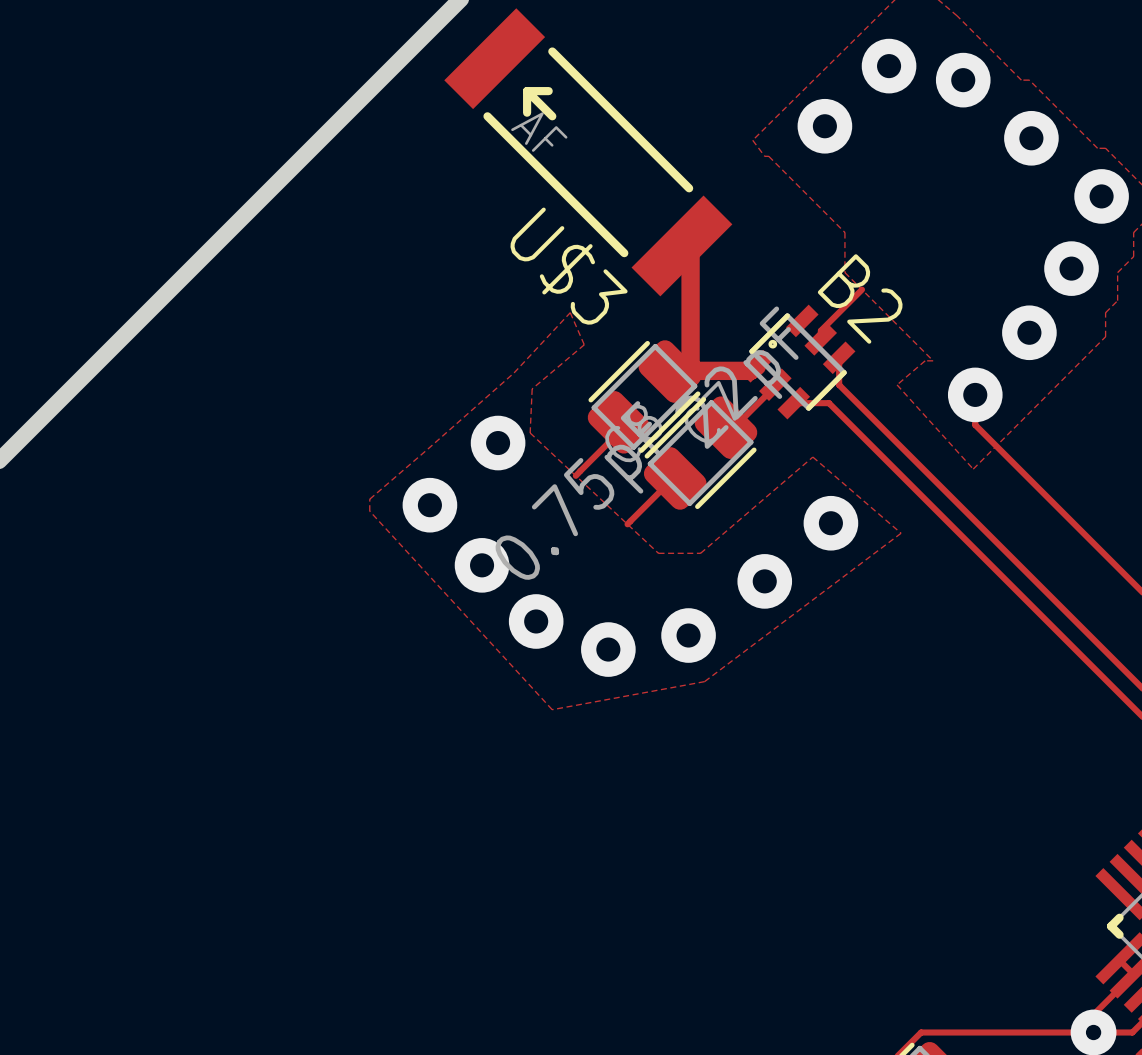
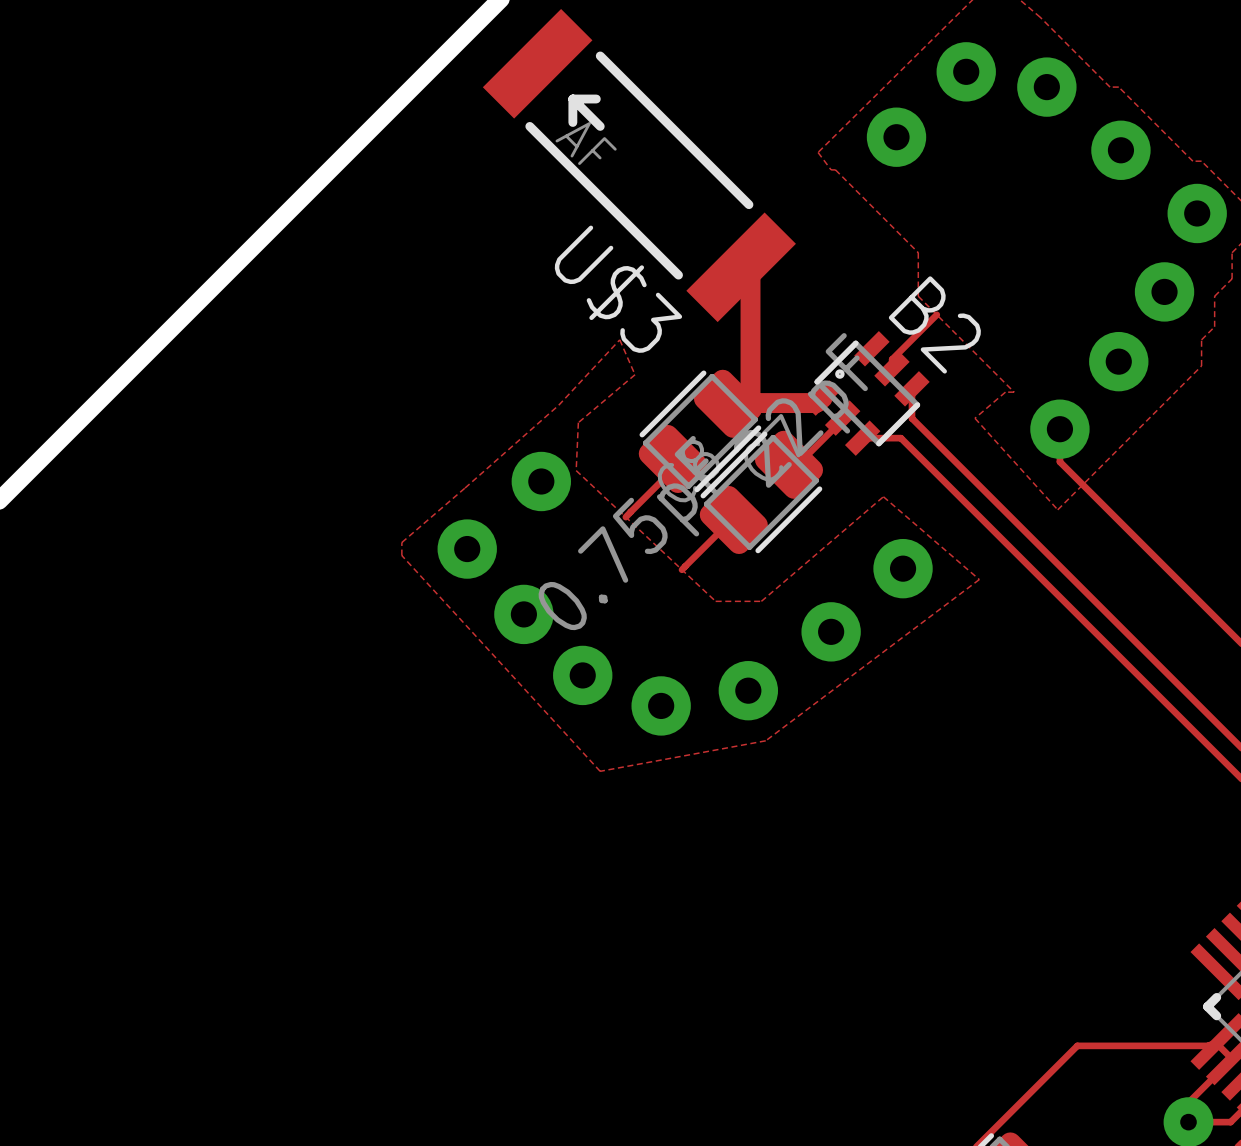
top track: (921, 1032) (1093, 1032) -> (1001, 1122) (1077, 1045) (1208, 1045) (1218, 1041)

